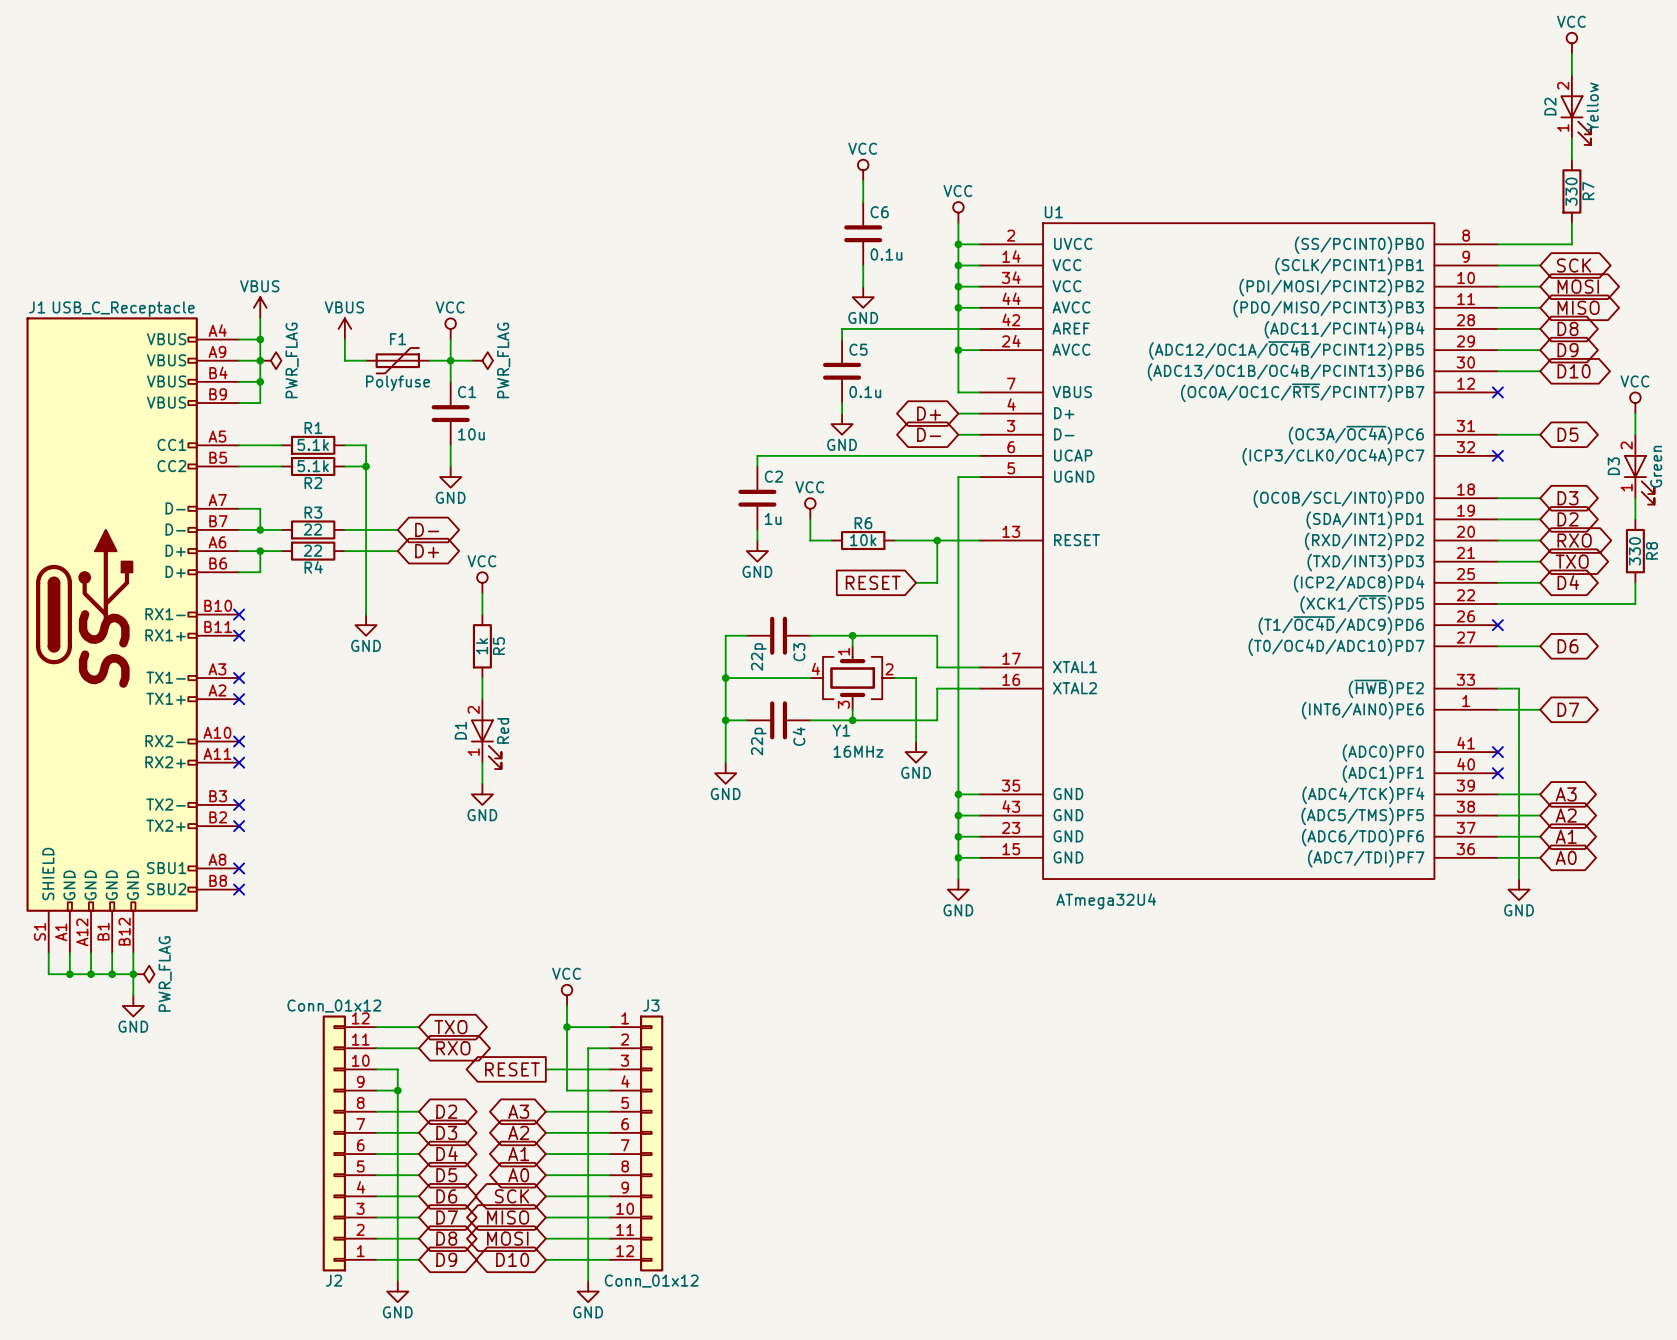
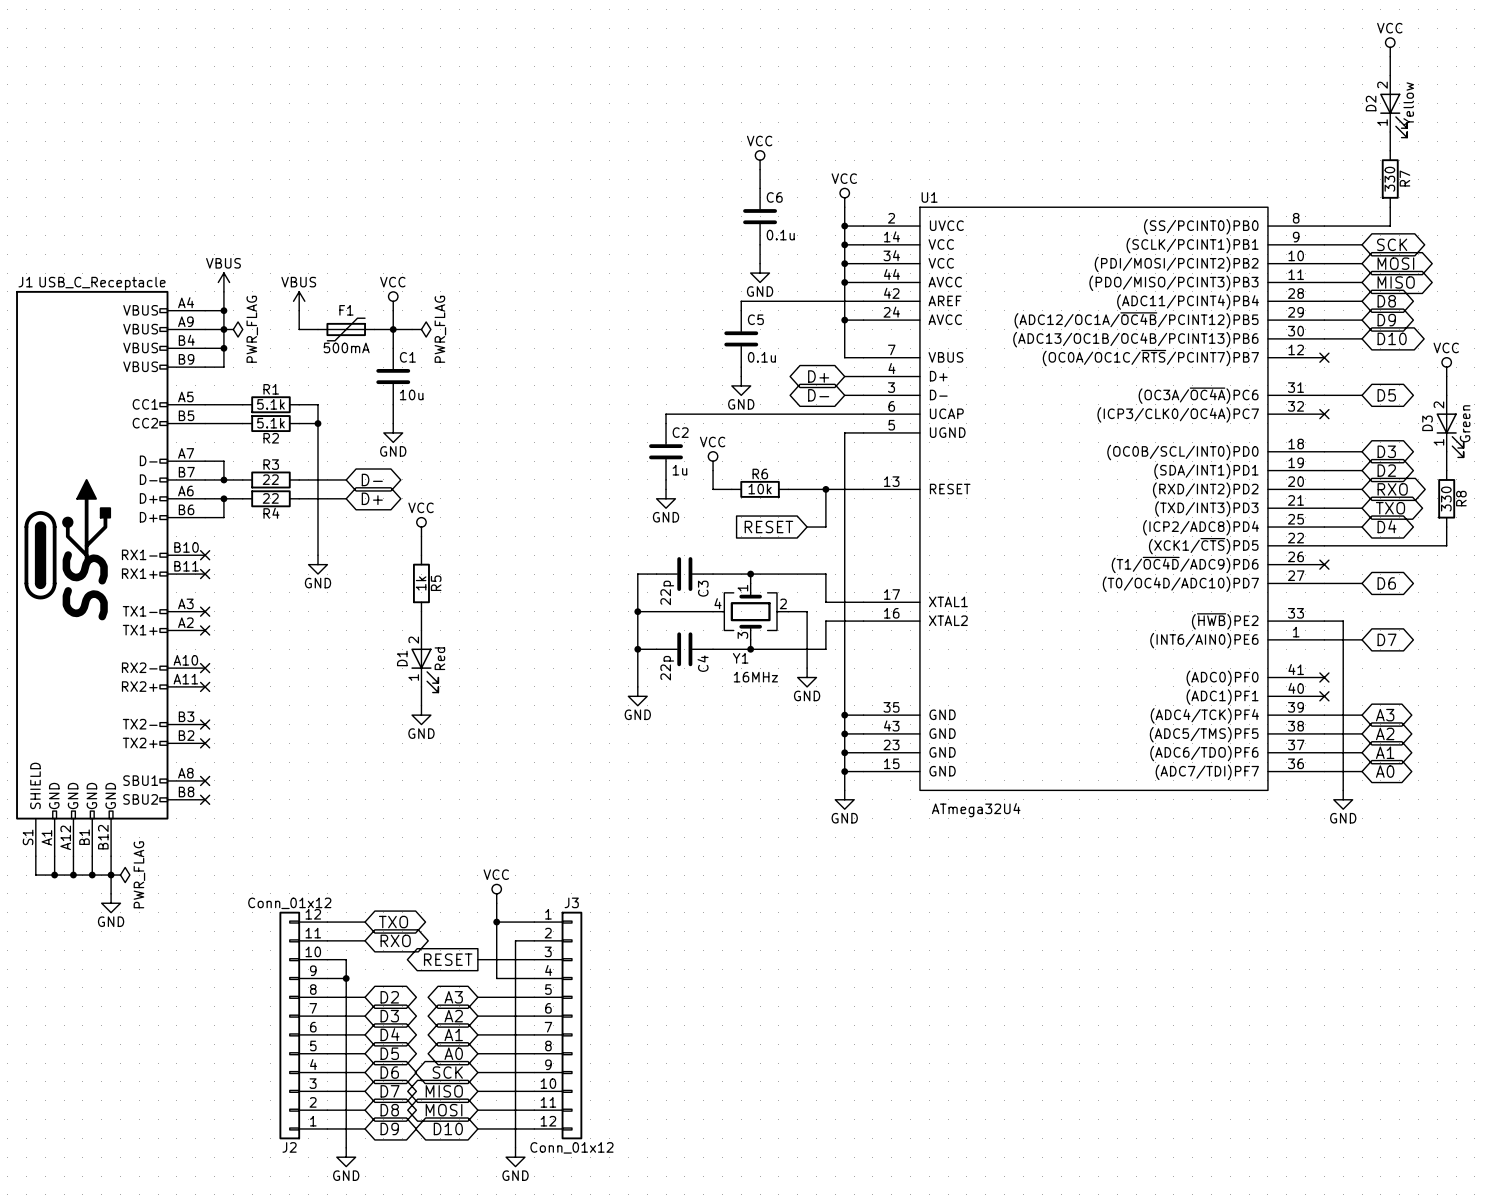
F1 value: Polyfuse (398, 383) -> 500mA (346, 347)

